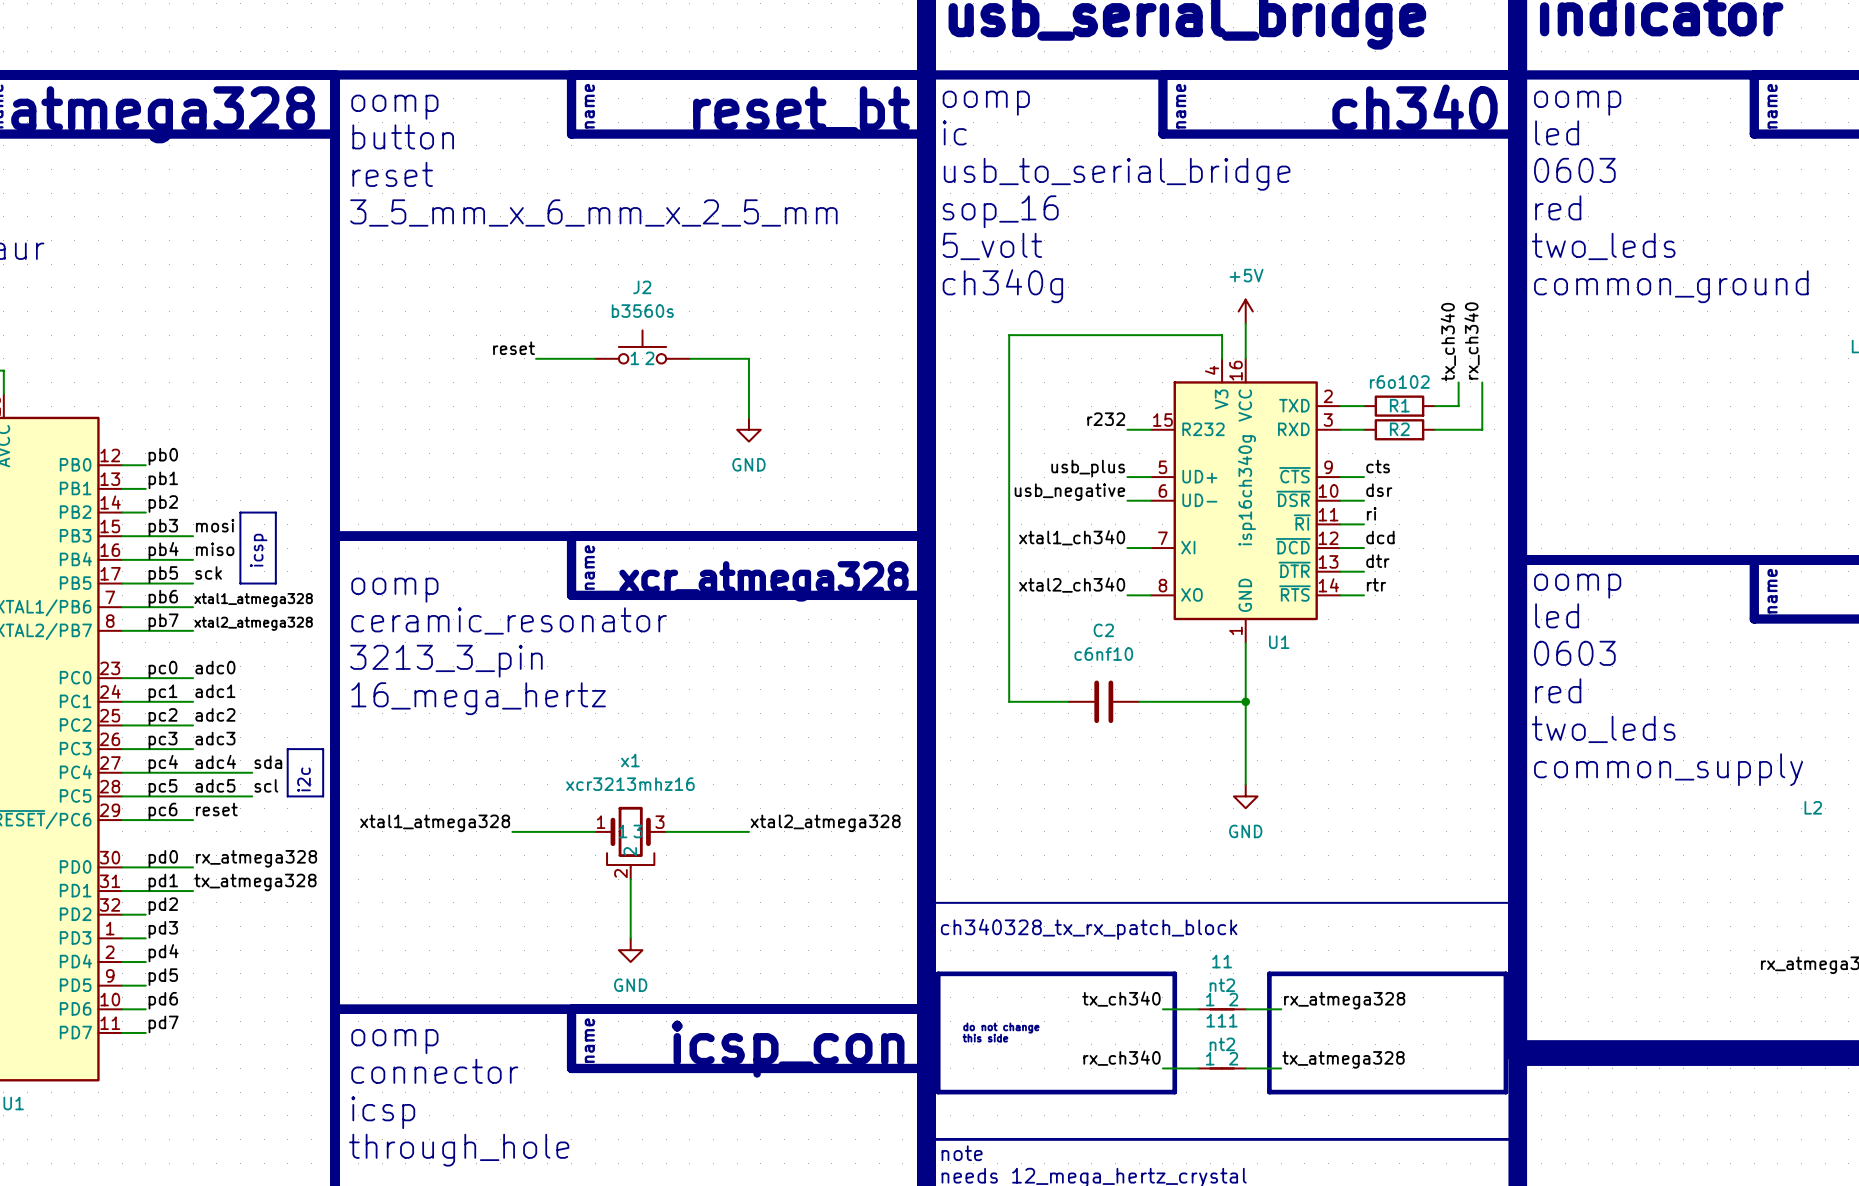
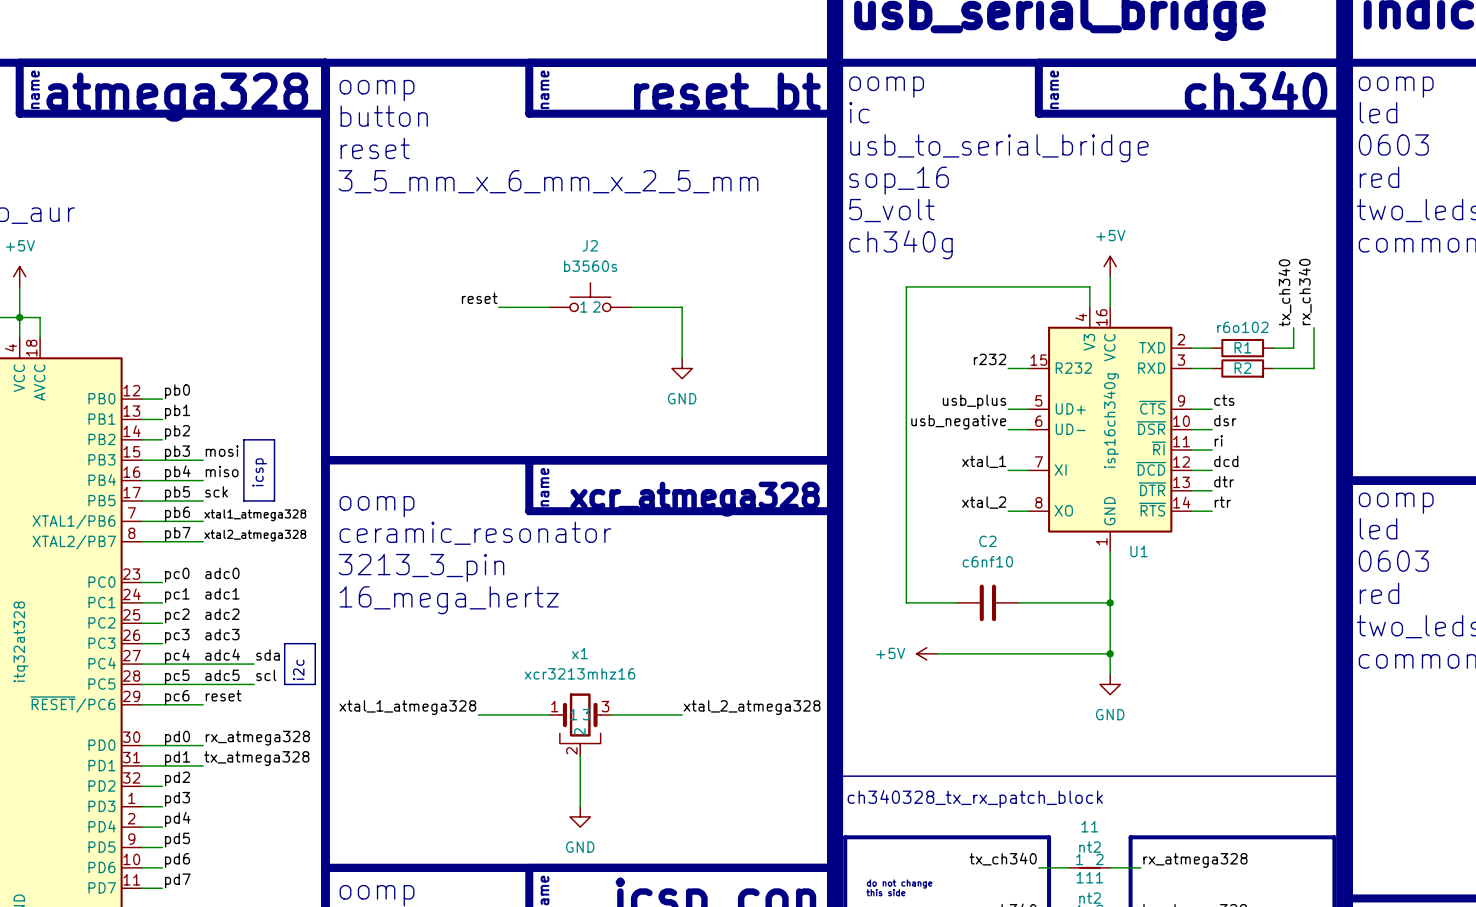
label: xtal1_ch340 (1072, 537) -> xtal_1 (984, 461)
label: xtal2_ch340 (1072, 585) -> xtal_2 (984, 502)
wire: (145, 678) (193, 678) -> none
wire: (145, 701) (193, 701) -> none
wire: (145, 725) (193, 725) -> none
wire: (145, 749) (193, 749) -> none
power symbol: none -> +5V (926, 653)
wire: none -> (936, 653) (1110, 653)
junction: none -> (1110, 653)
label: xtal1_atmega328 (435, 823) -> xtal_1_atmega328 (407, 707)
label: xtal2_atmega328 (825, 823) -> xtal_2_atmega328 (752, 707)

